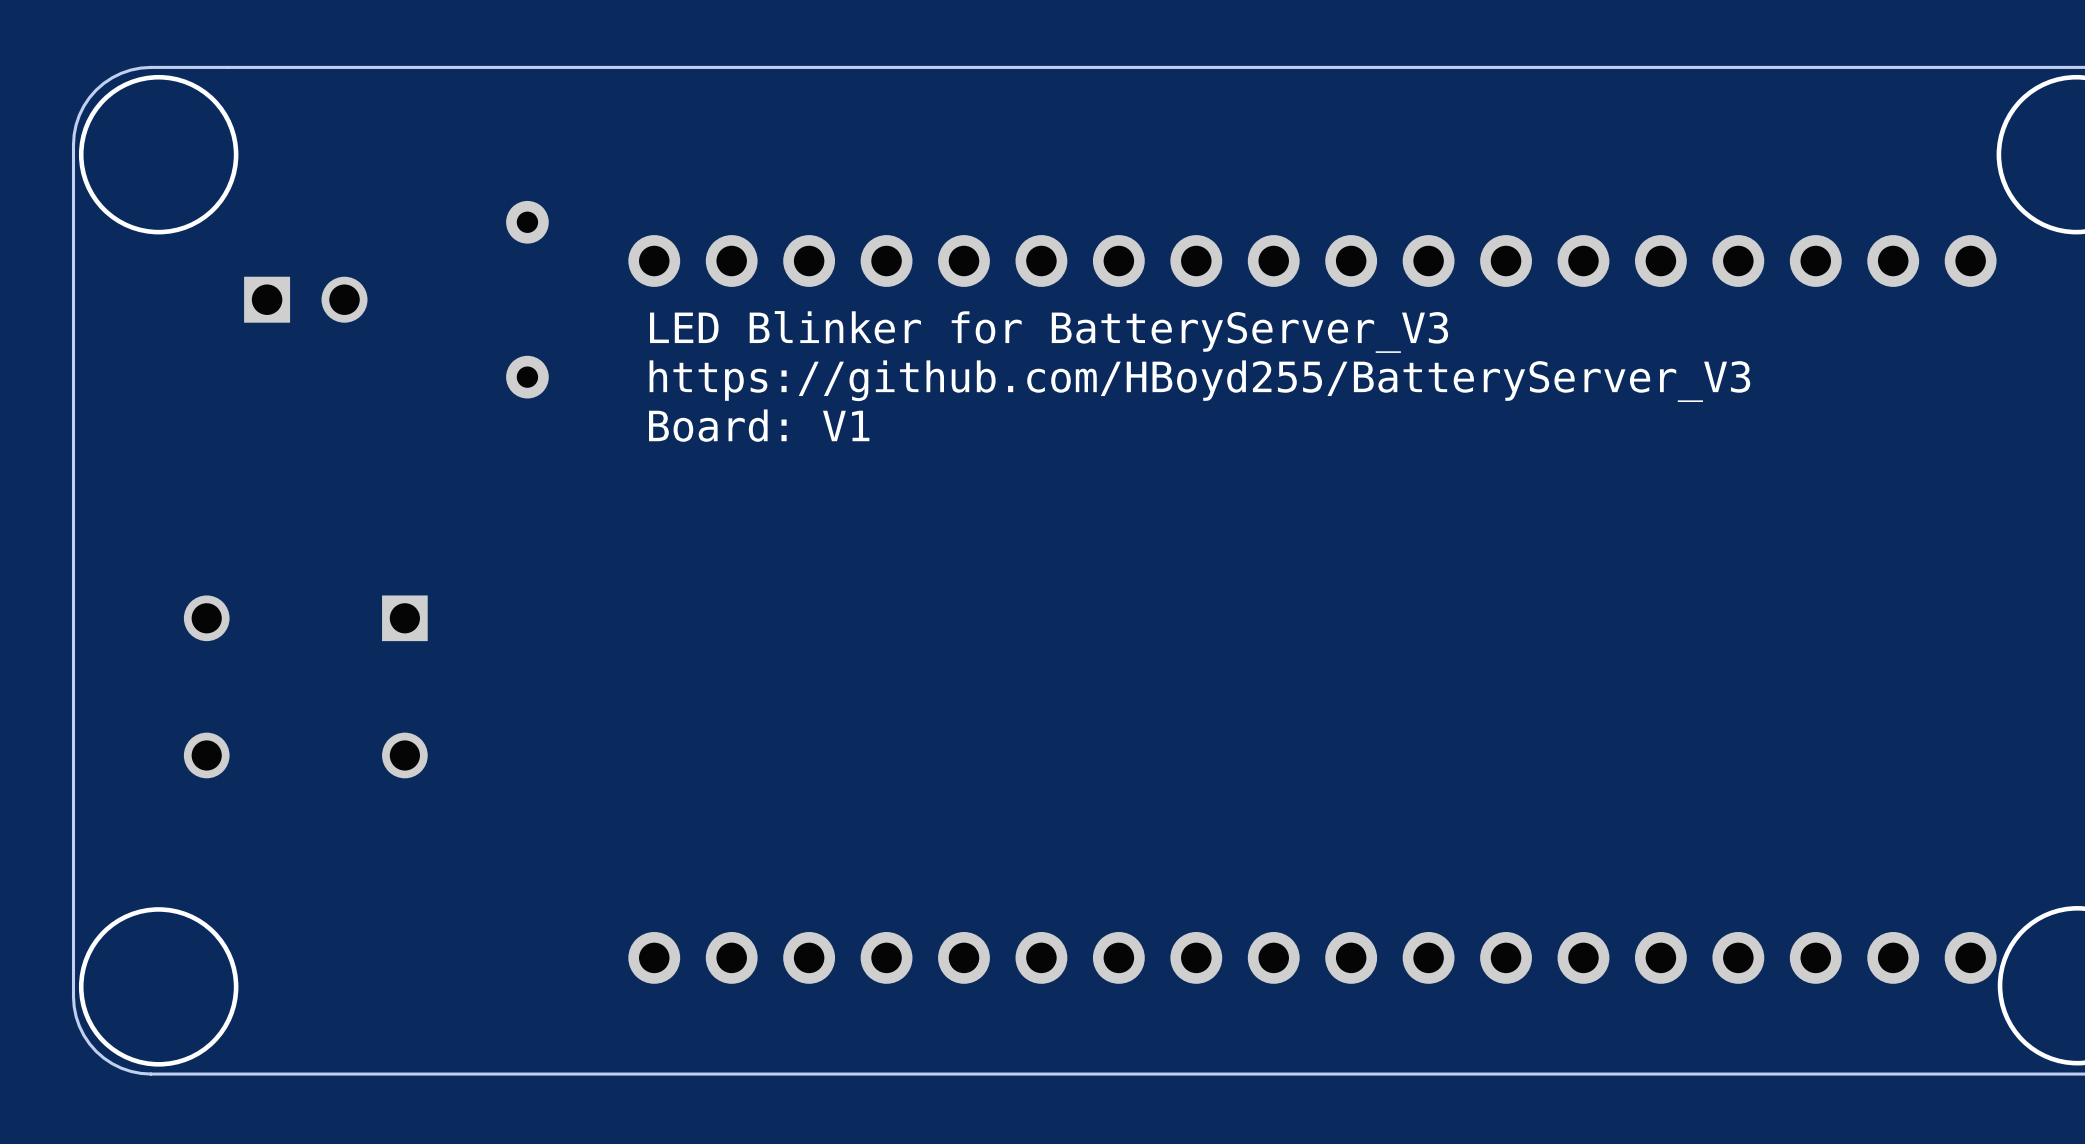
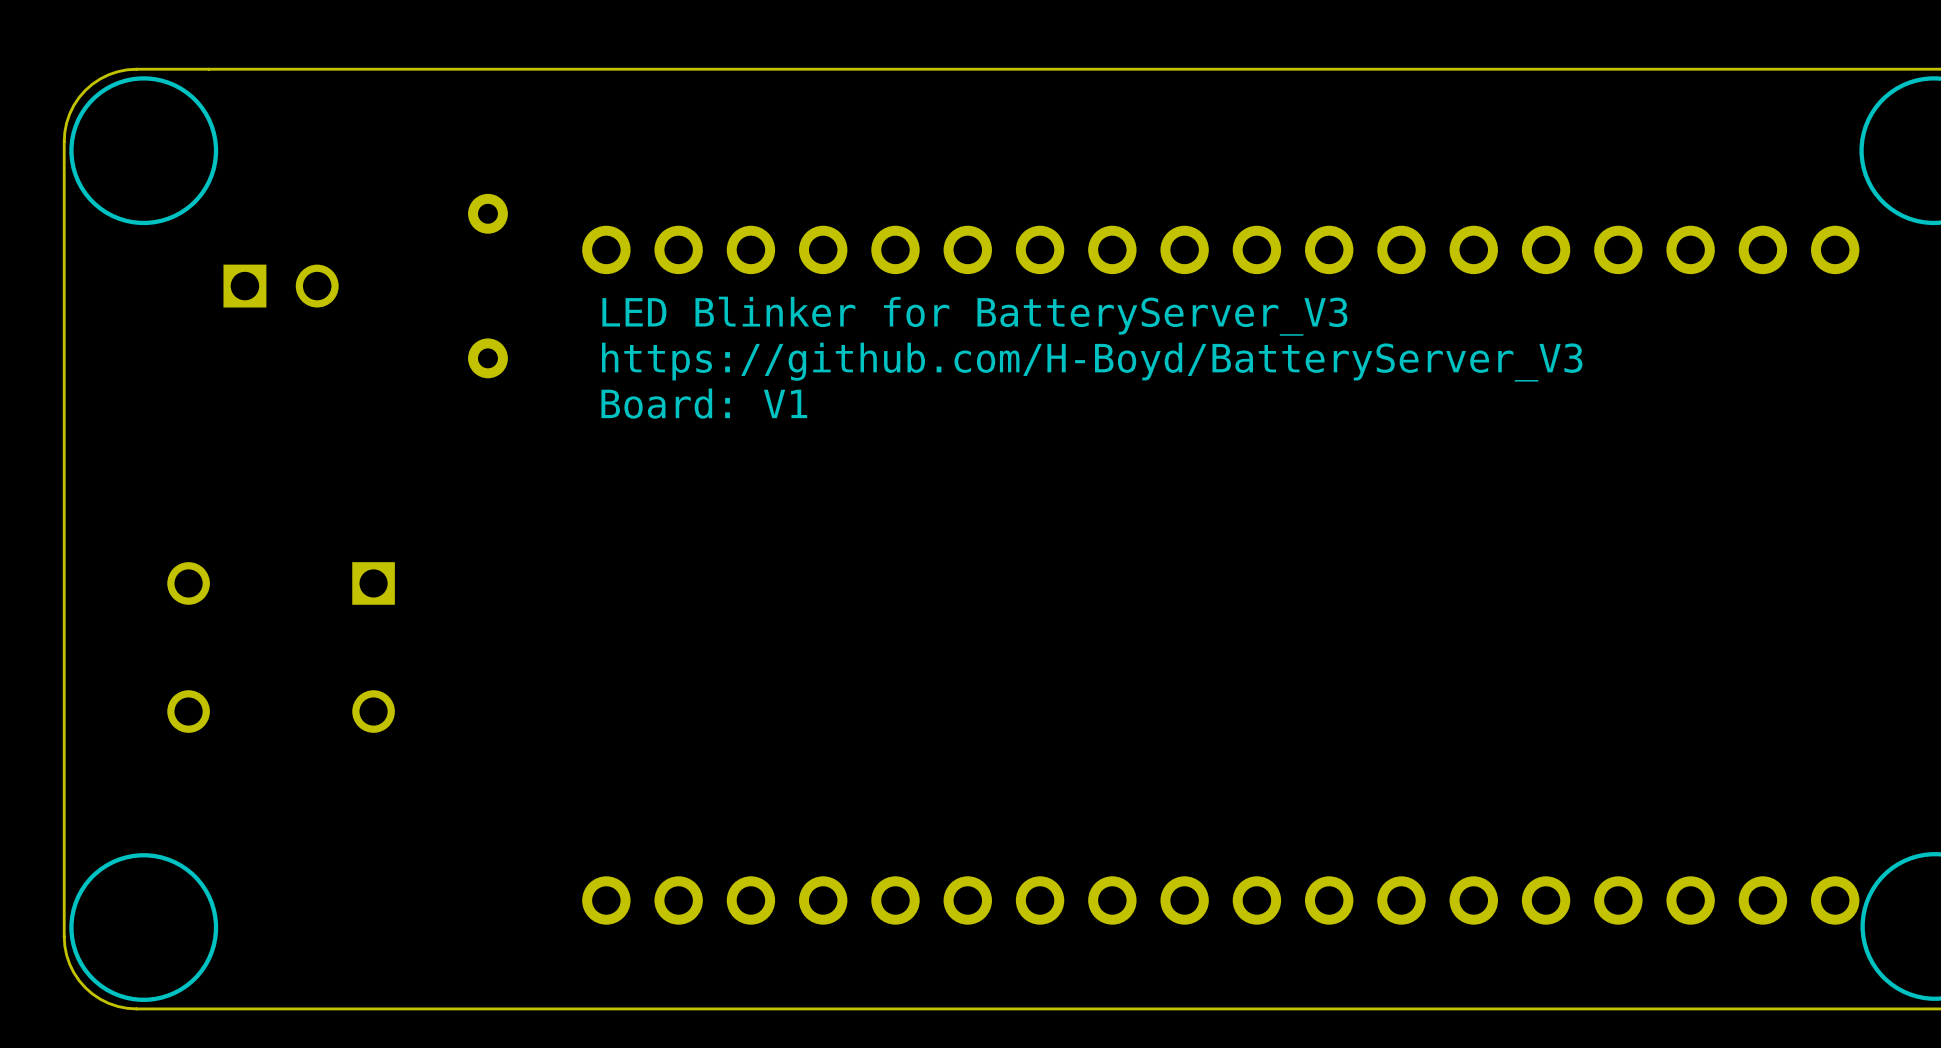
text: https://github.com/HBoyd255/BatteryServer_V3 (1199, 381) -> https://github.com/H-Boyd/BatteryServer_V3 (1092, 362)

